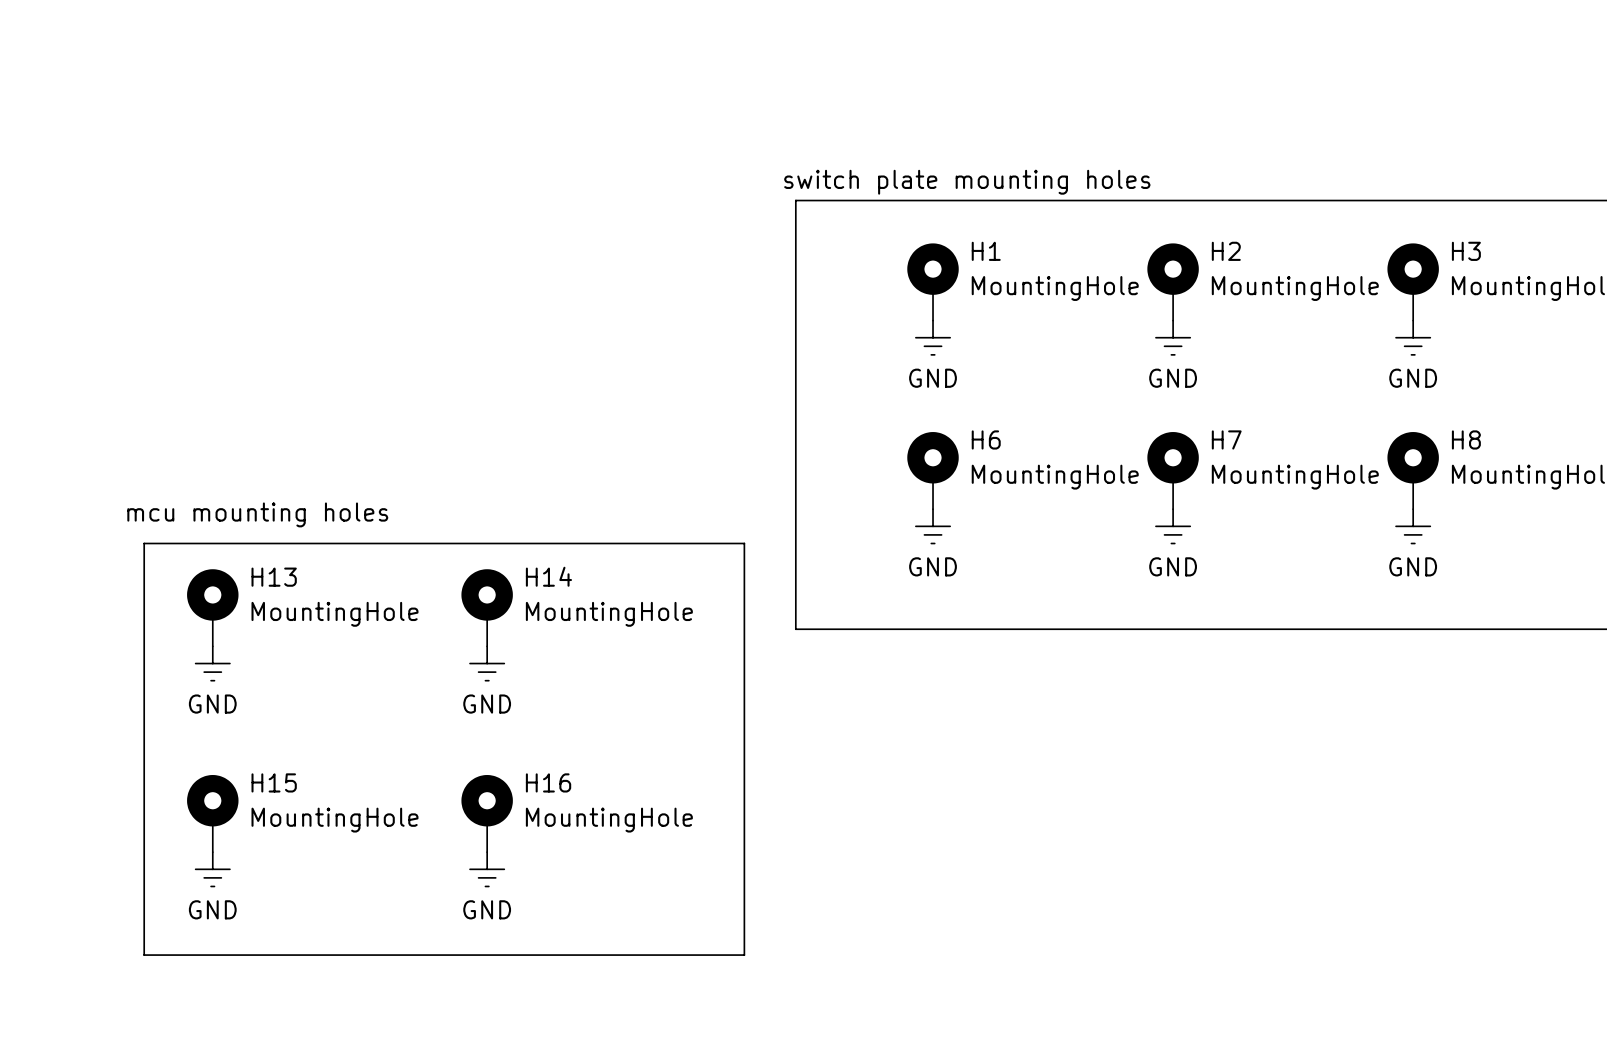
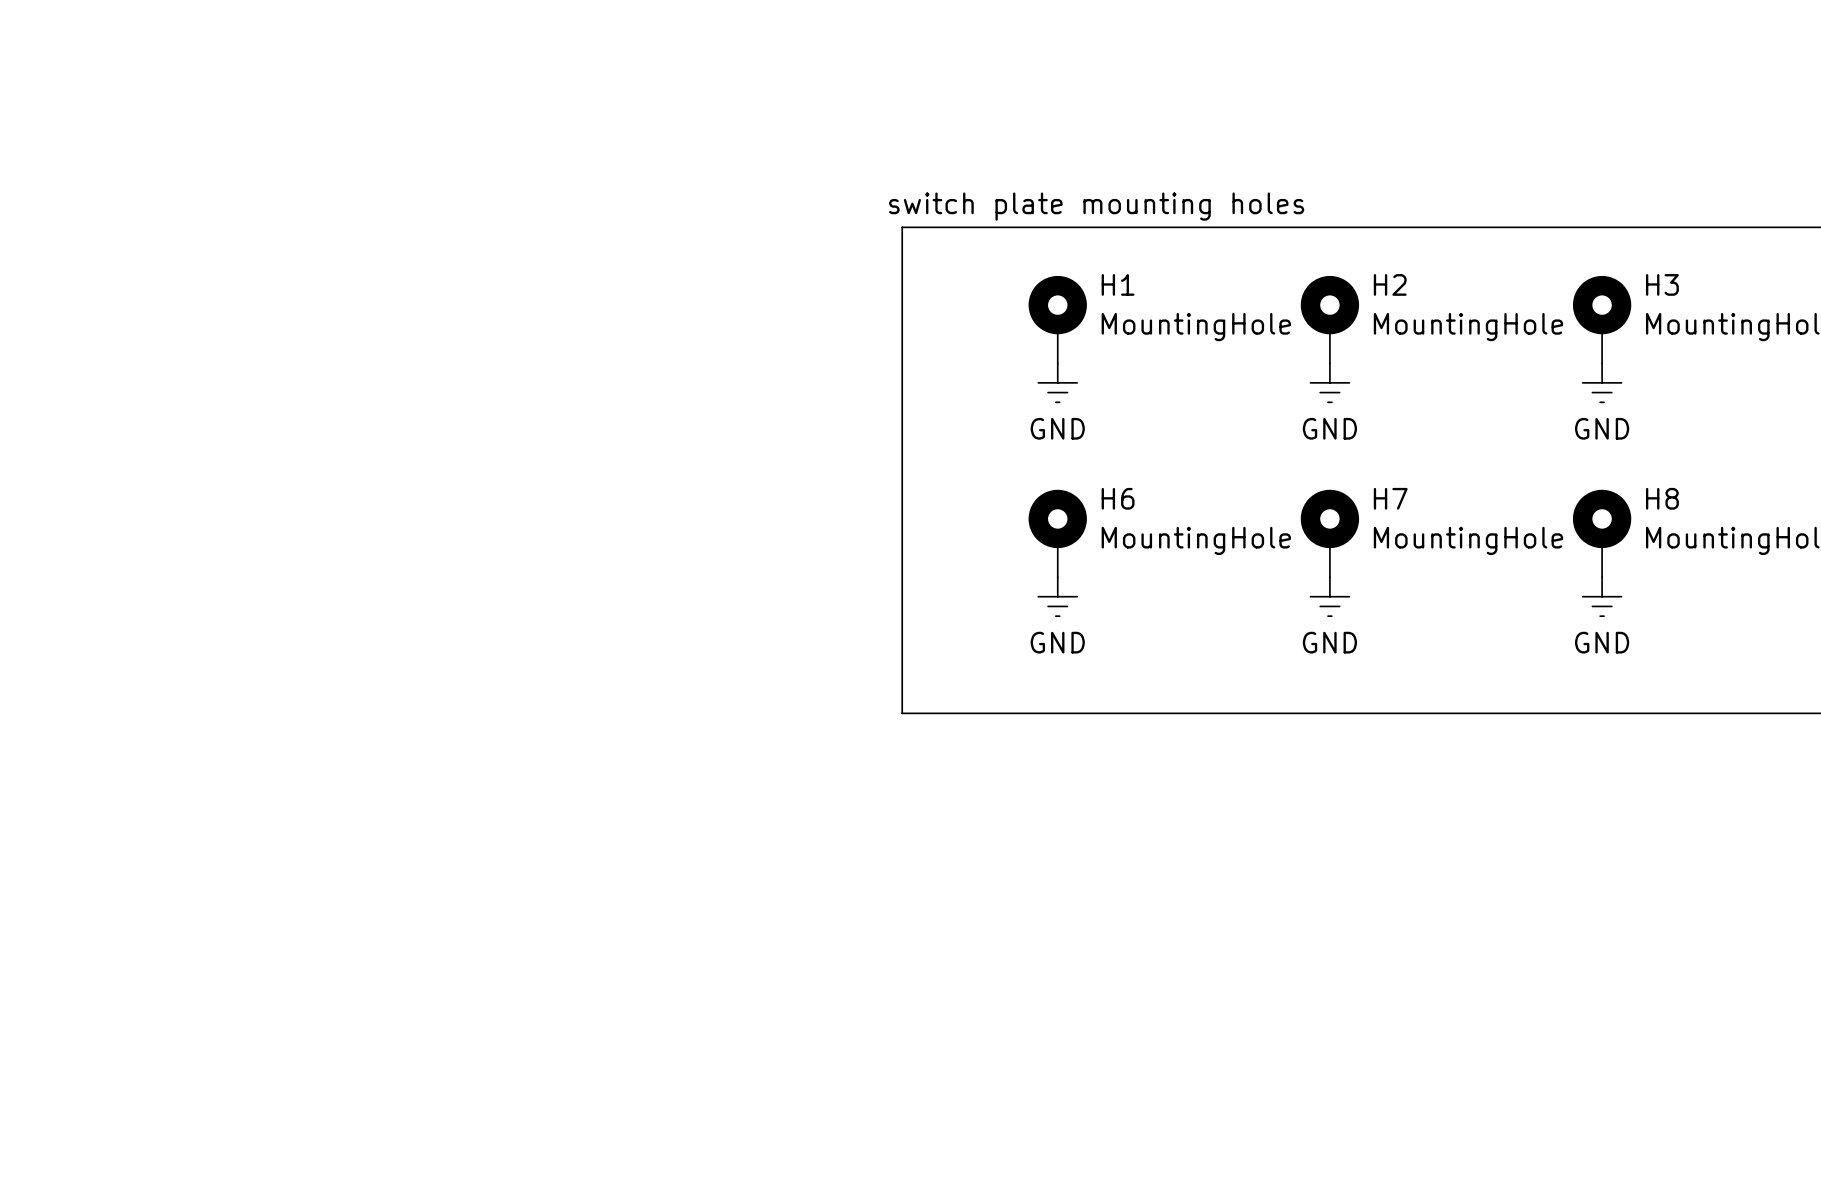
text: mcu mounting holes (257, 514) -> none
line: (144, 543) (744, 543) (744, 955) (144, 955) (144, 543) -> none
H13: MountingHole (212, 607) -> none
H14: MountingHole (487, 607) -> none
power symbol: GND (212, 663) -> none
power symbol: GND (487, 663) -> none
H15: MountingHole (212, 813) -> none
H16: MountingHole (487, 813) -> none
power symbol: GND (212, 869) -> none
power symbol: GND (487, 869) -> none

